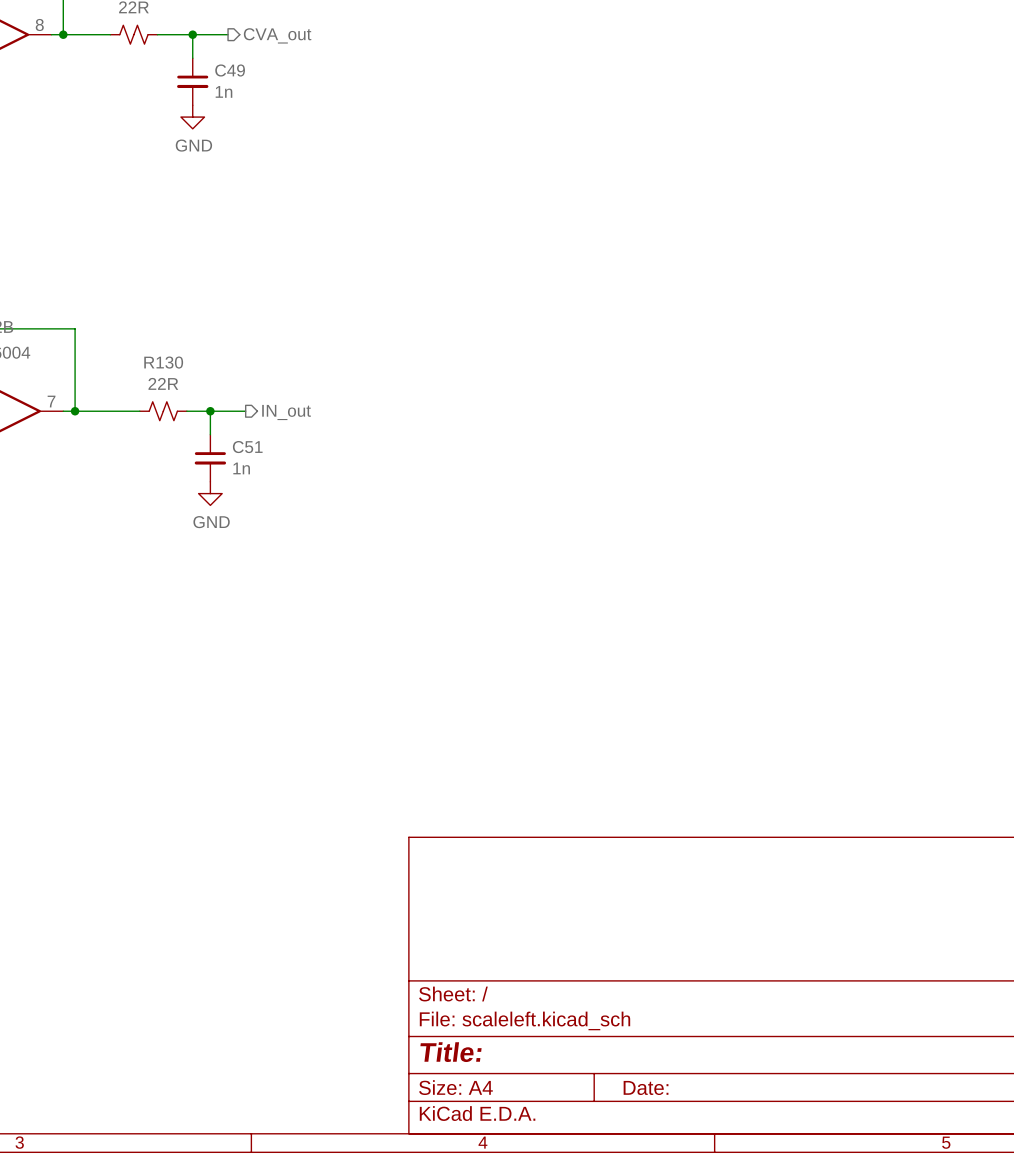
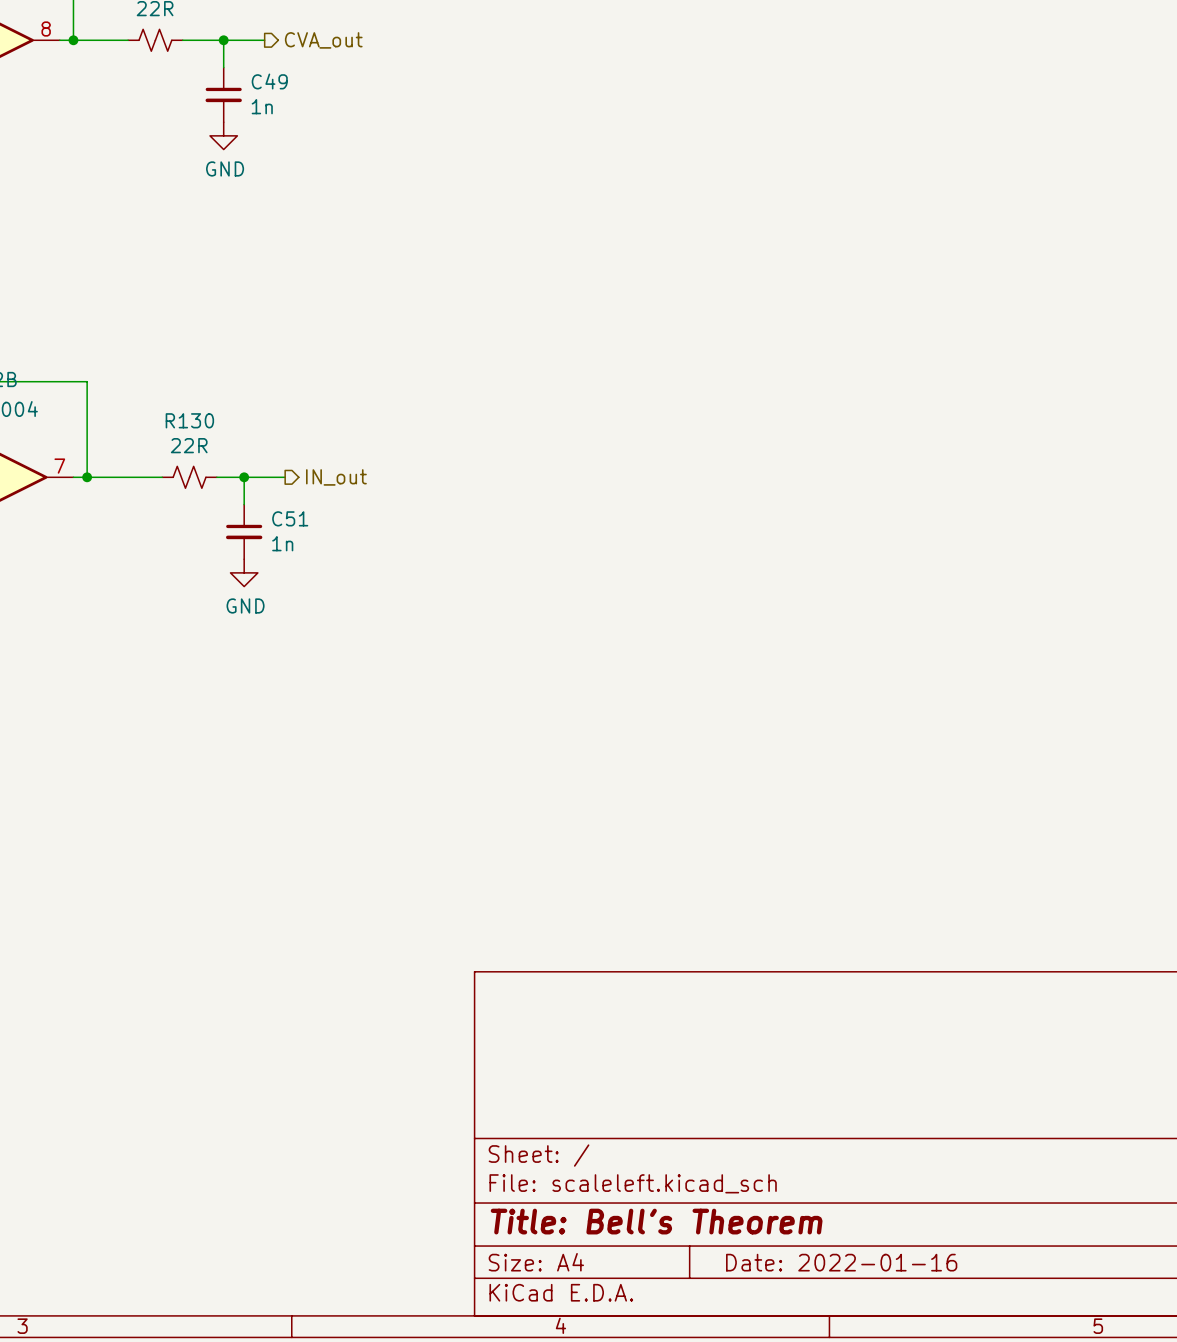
title block: Title: (451, 1052) -> Title: Bell's Theorem (656, 1221)
title block: Date: (646, 1087) -> Date: 2022-01-16 (841, 1262)

